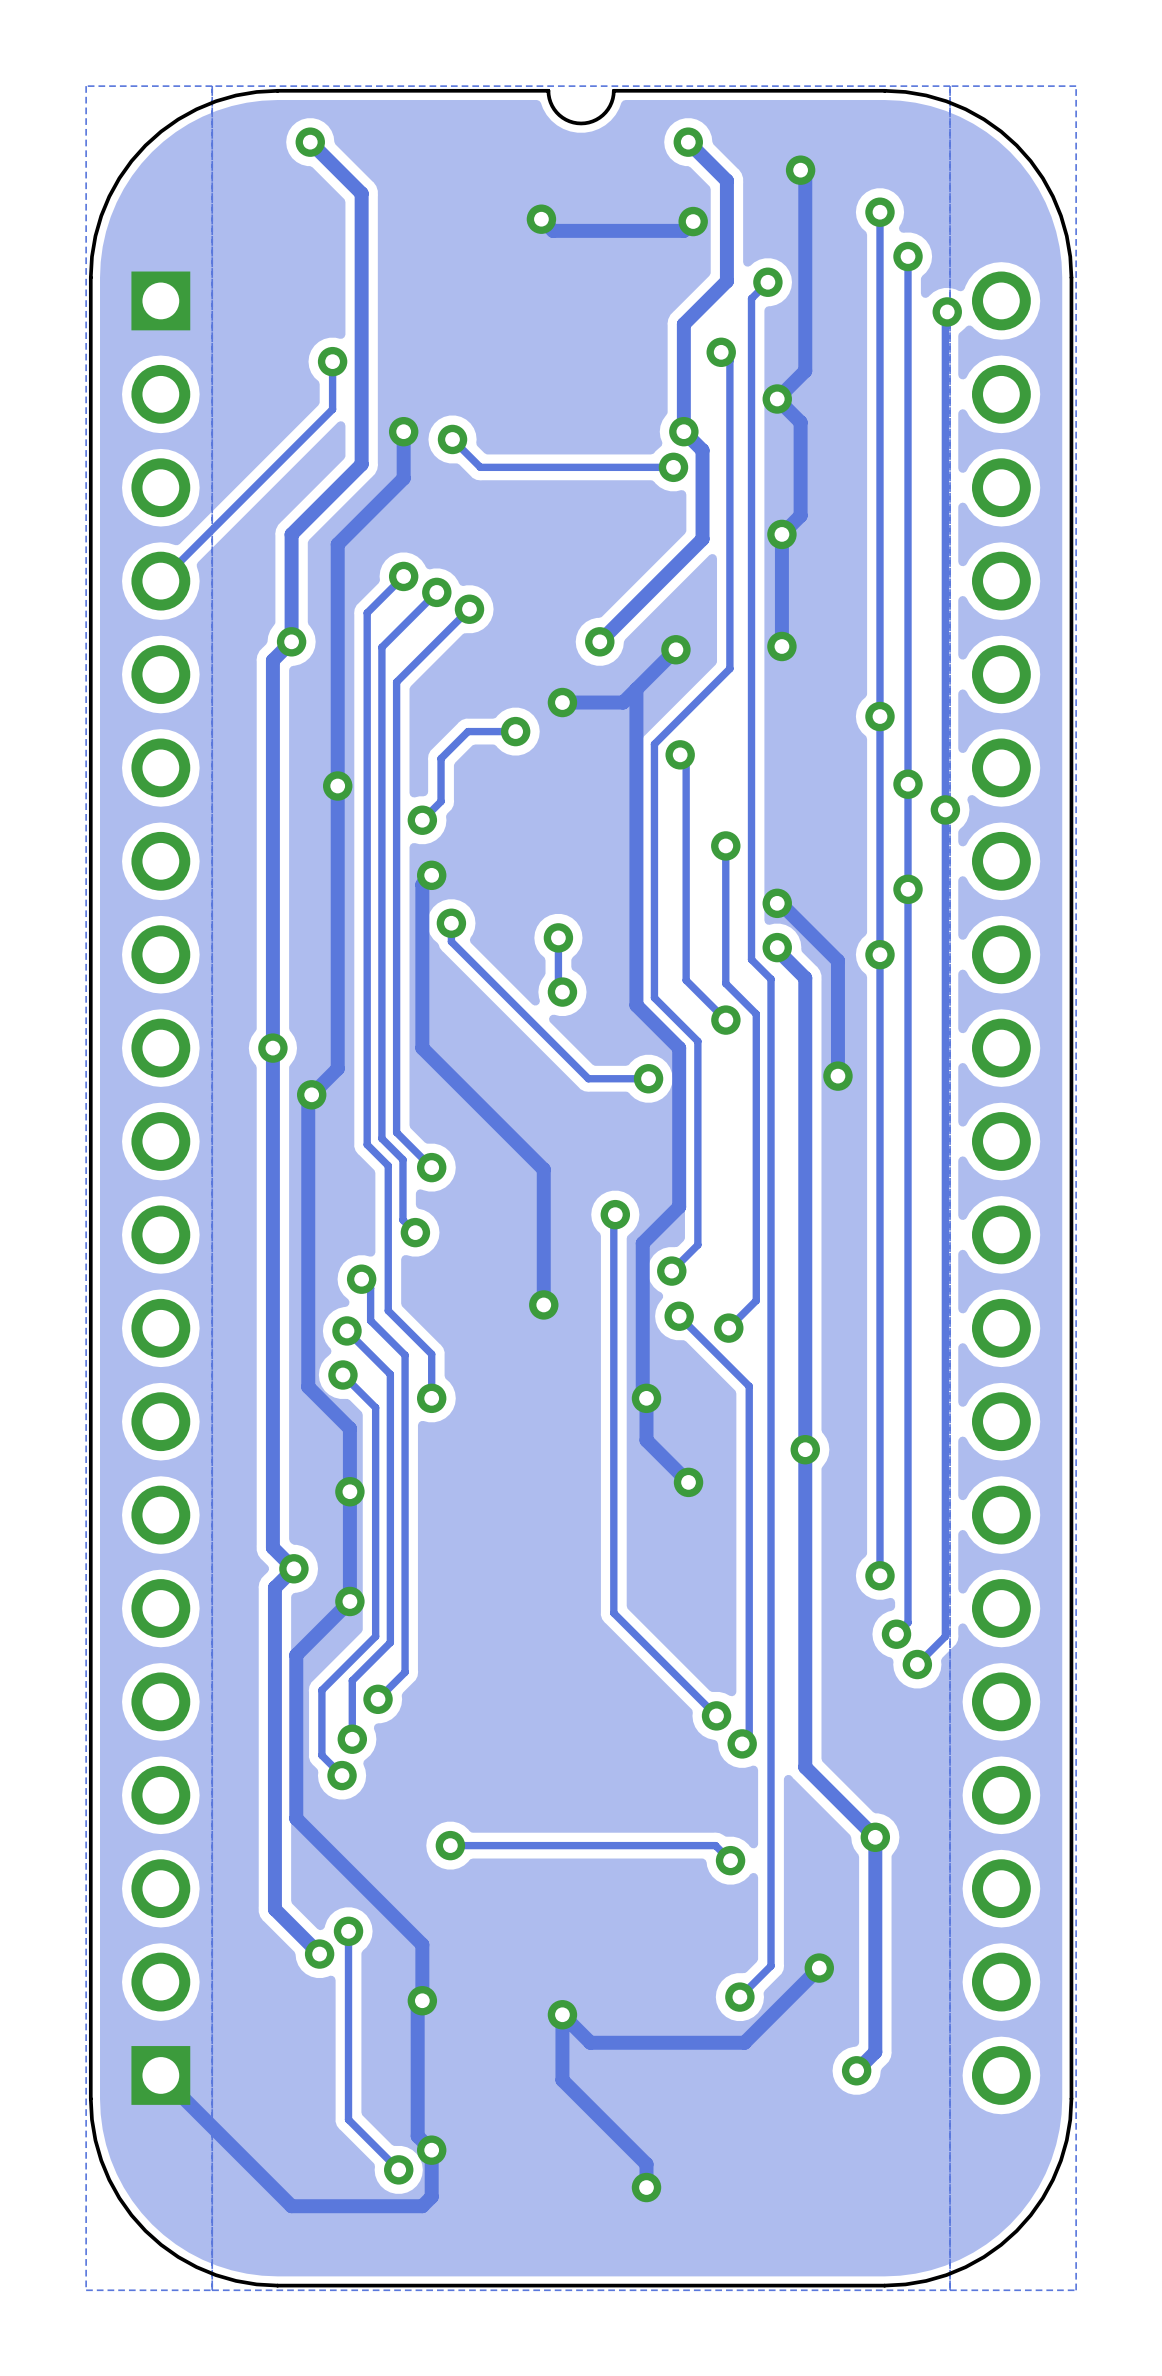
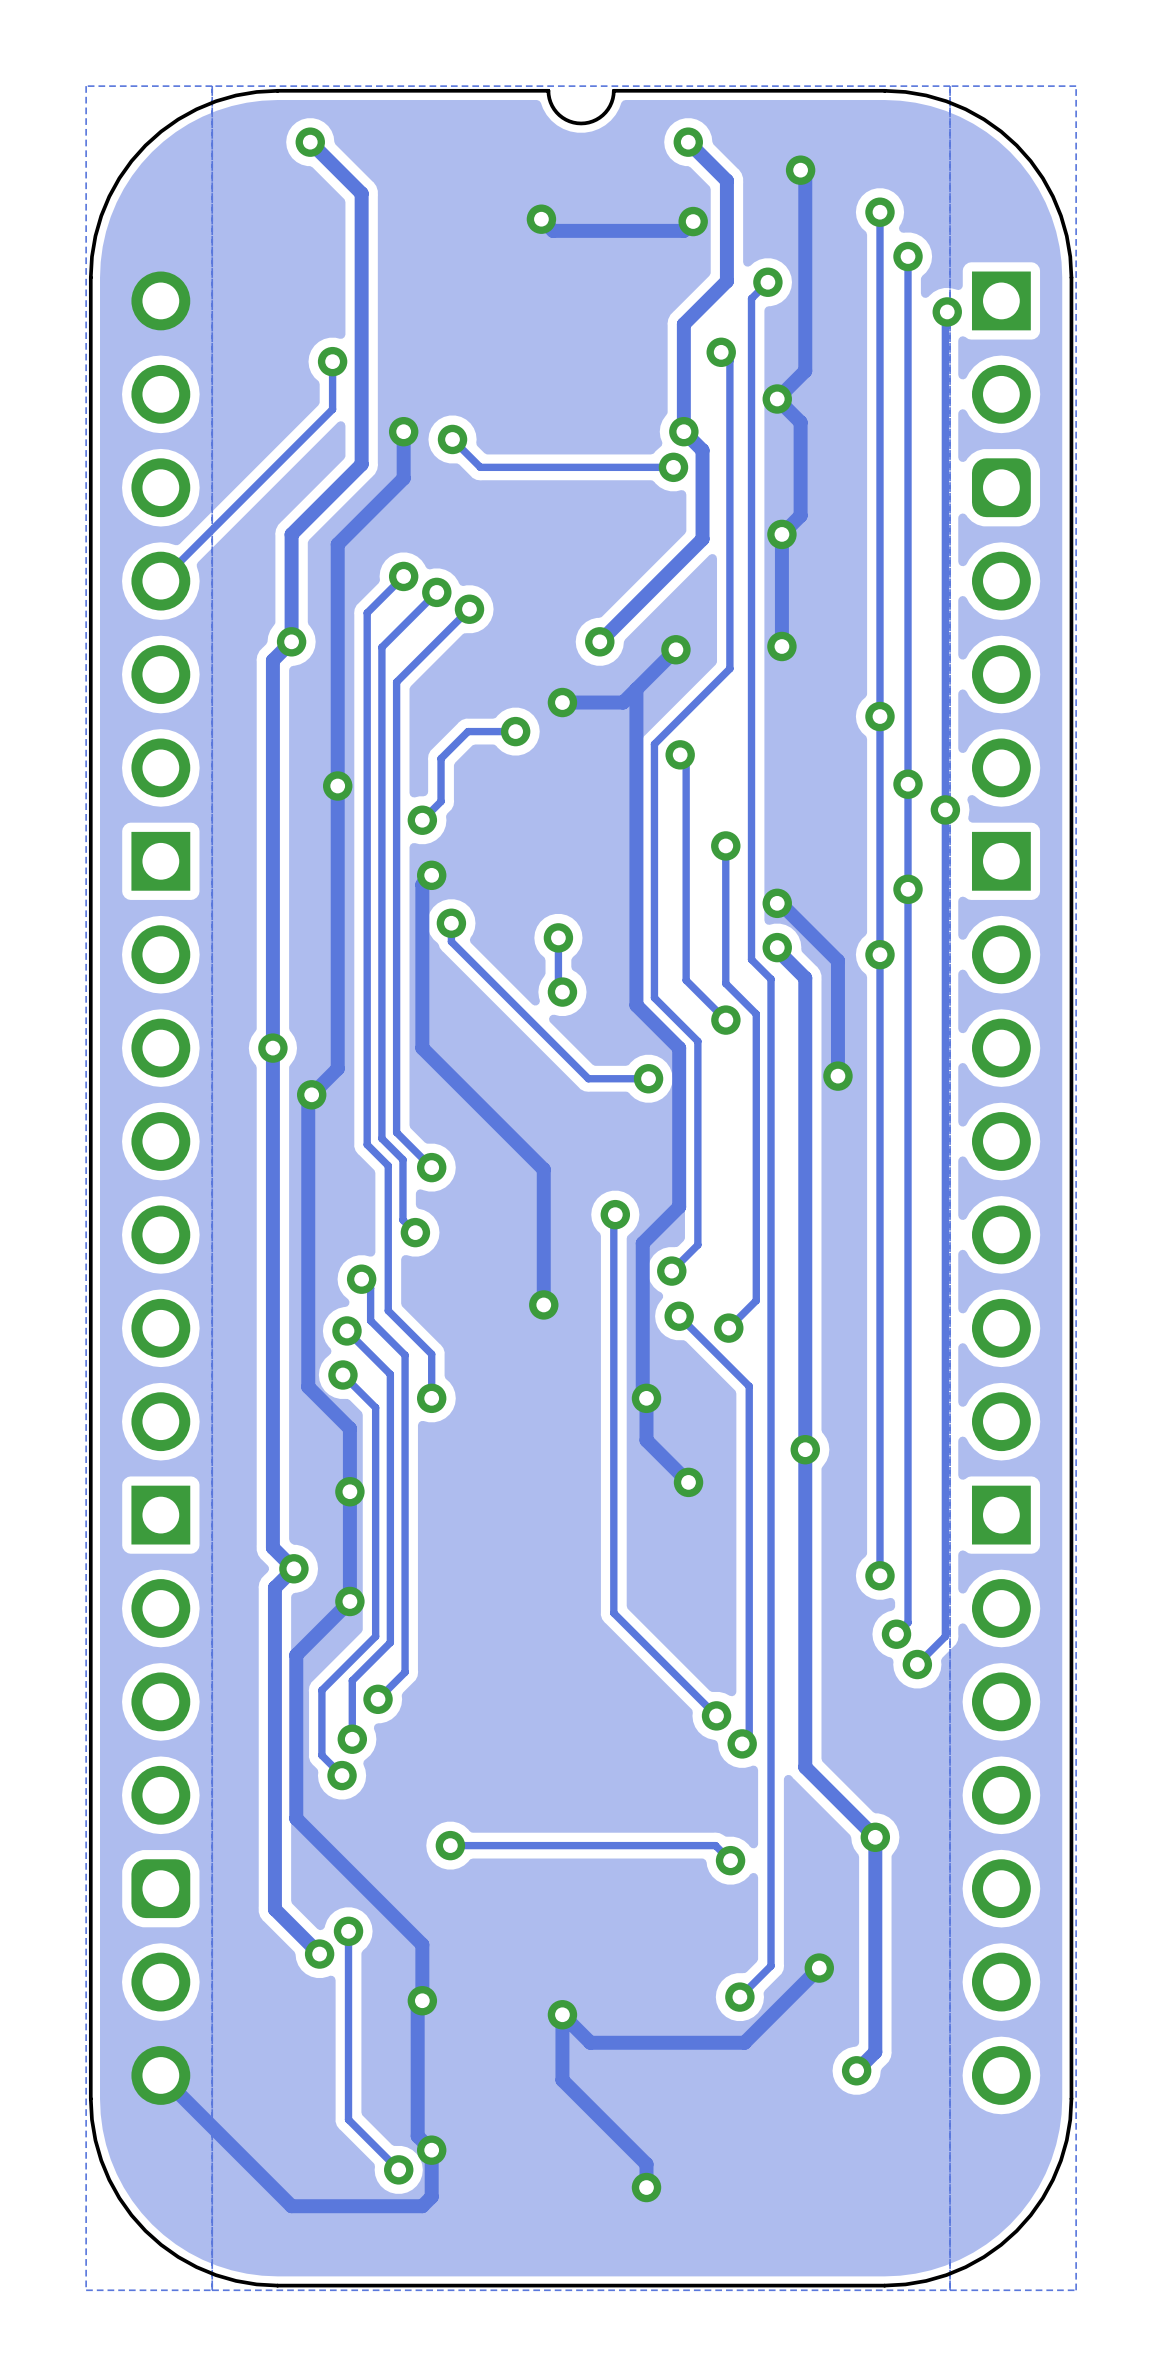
part footprint: [88, 88, 1074, 2288] -> [88, 88, 1074, 2288]

